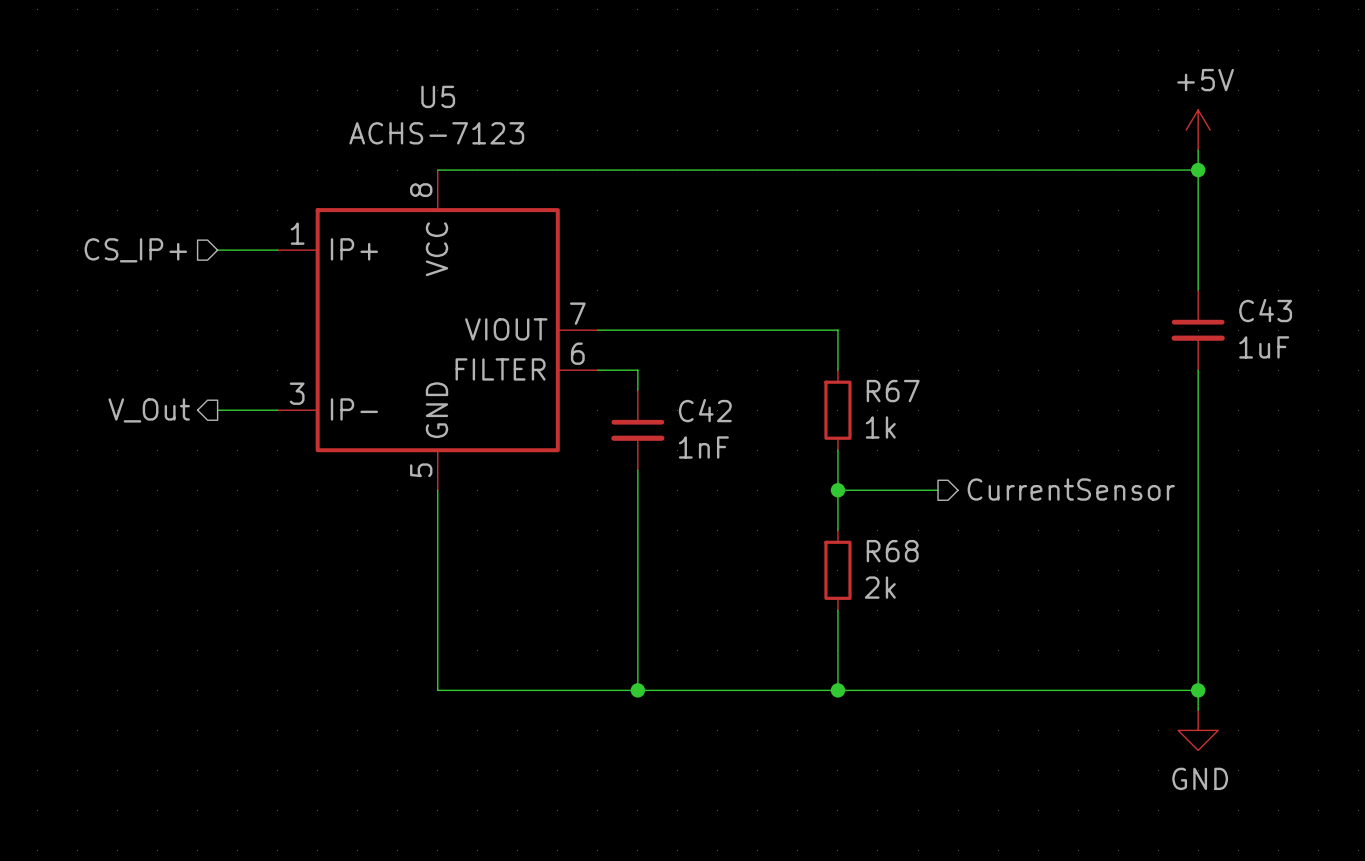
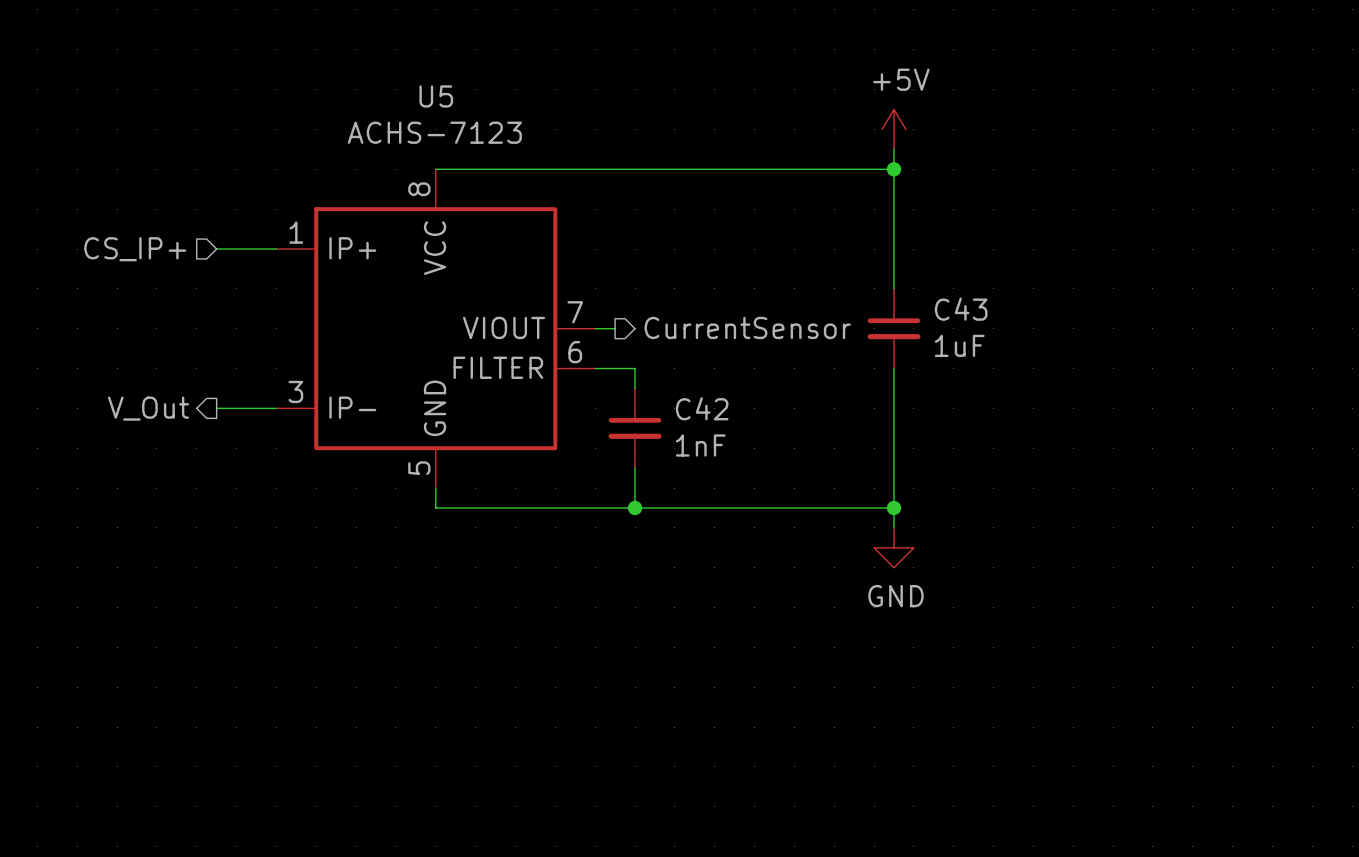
power symbol position: +5V (1198, 130) -> +5V (893, 129)
wire: (1198, 150) (1198, 290) -> (893, 149) (893, 288)
wire: (898, 170) (1198, 170) -> none
junction: none -> (893, 169)
junction: (1198, 170) -> none
wire: (617, 330) (837, 330) (837, 370) -> none
C43 position: (1198, 330) -> (893, 328)
wire: none -> (893, 368) (893, 527)
wire: (1198, 370) (1198, 710) -> none
R67: 1k (837, 410) -> none
wire: (837, 450) (837, 530) -> none
hierarchical label position: CurrentSensor (1071, 489) -> CurrentSensor (747, 327)
wire: (837, 490) (938, 490) -> none
junction position: (837, 490) -> (893, 508)
wire: (437, 510) (437, 690) (1198, 690) -> (435, 508) (893, 508)
wire: (637, 510) (637, 690) -> none
junction: none -> (635, 508)
R68: 2k (837, 570) -> none
wire: (837, 610) (837, 690) -> none
junction: (637, 690) -> none
junction: (837, 690) -> none
junction: (1198, 690) -> none
power symbol position: GND (1198, 730) -> GND (893, 547)

